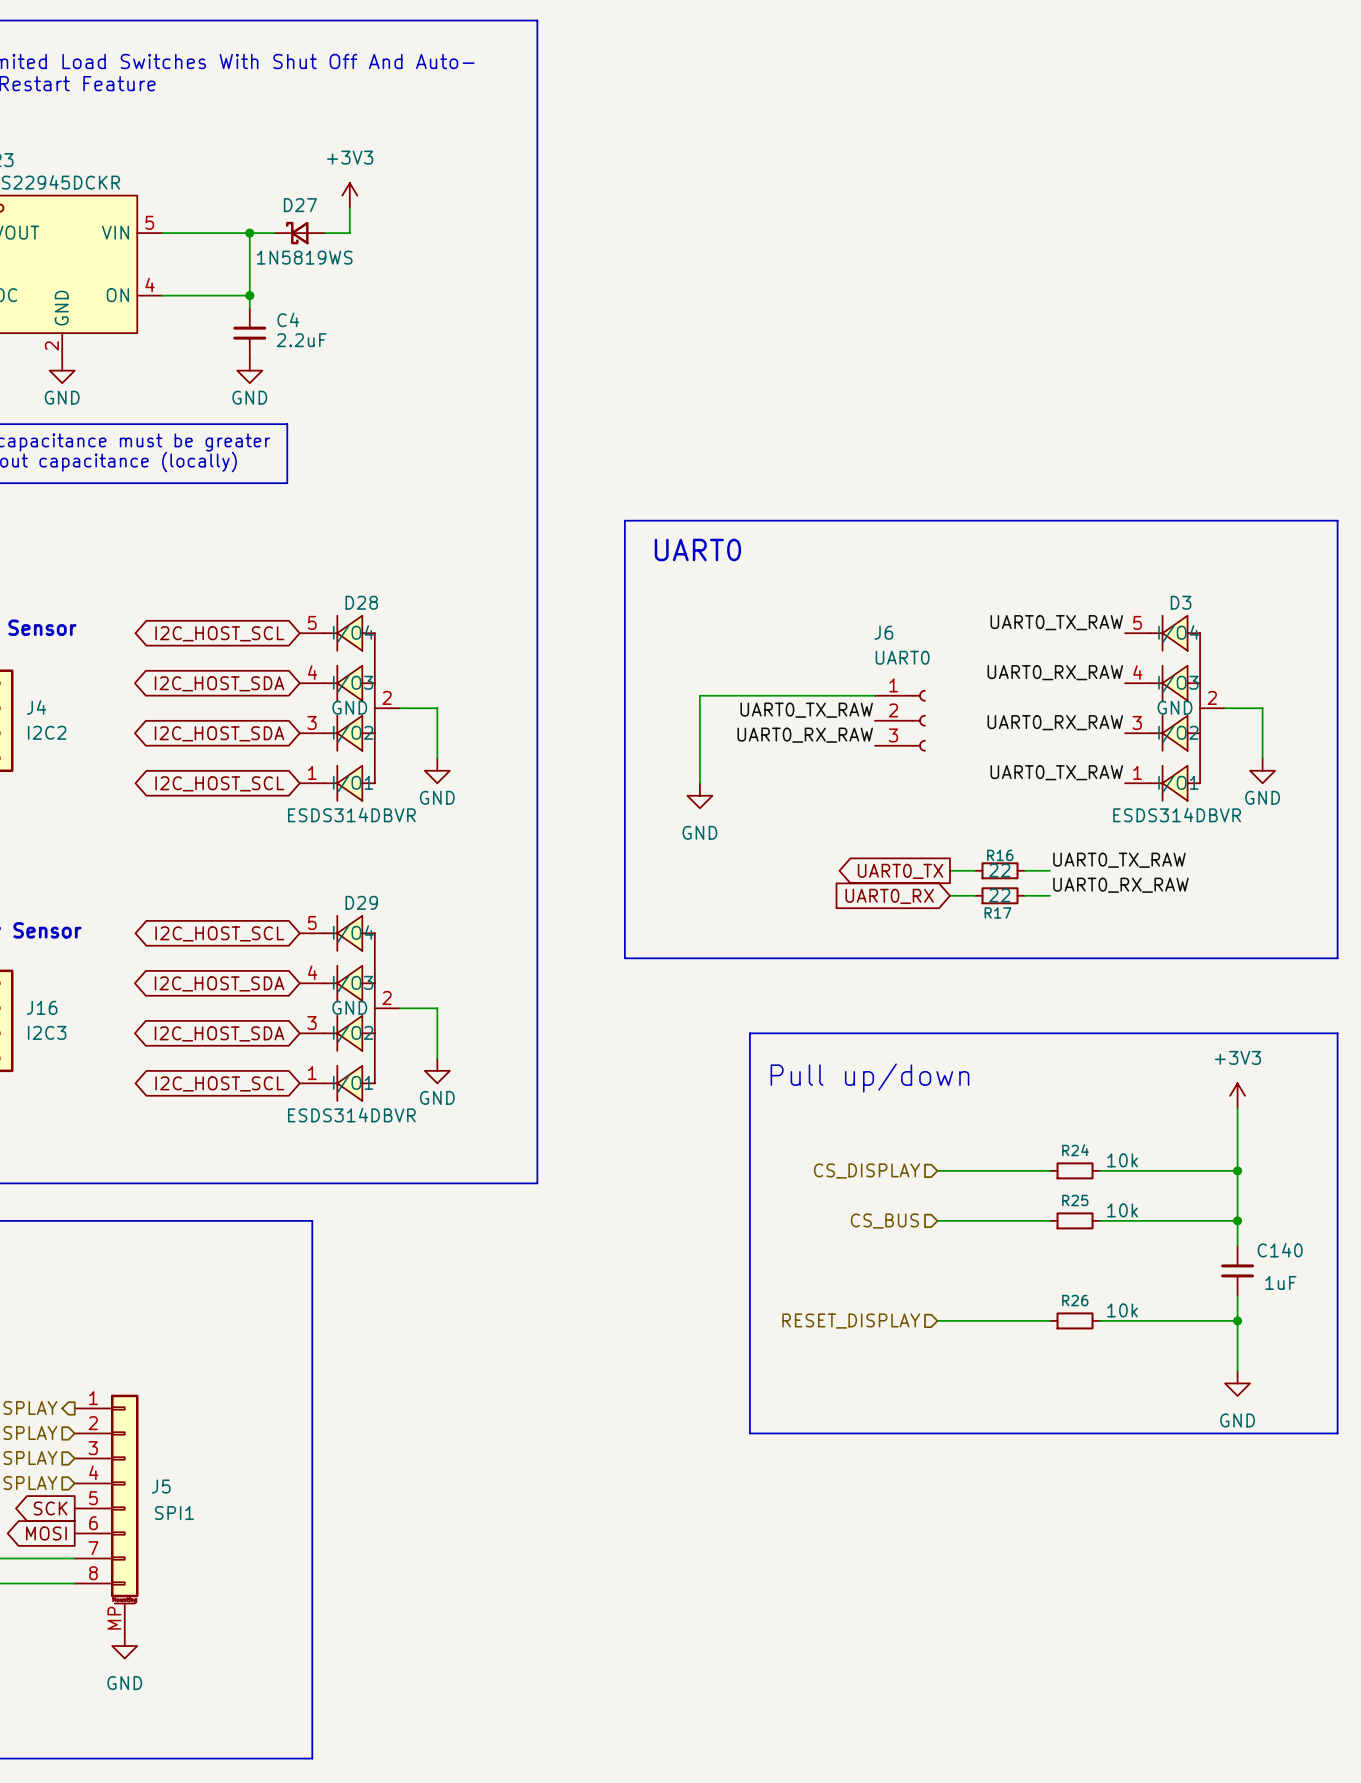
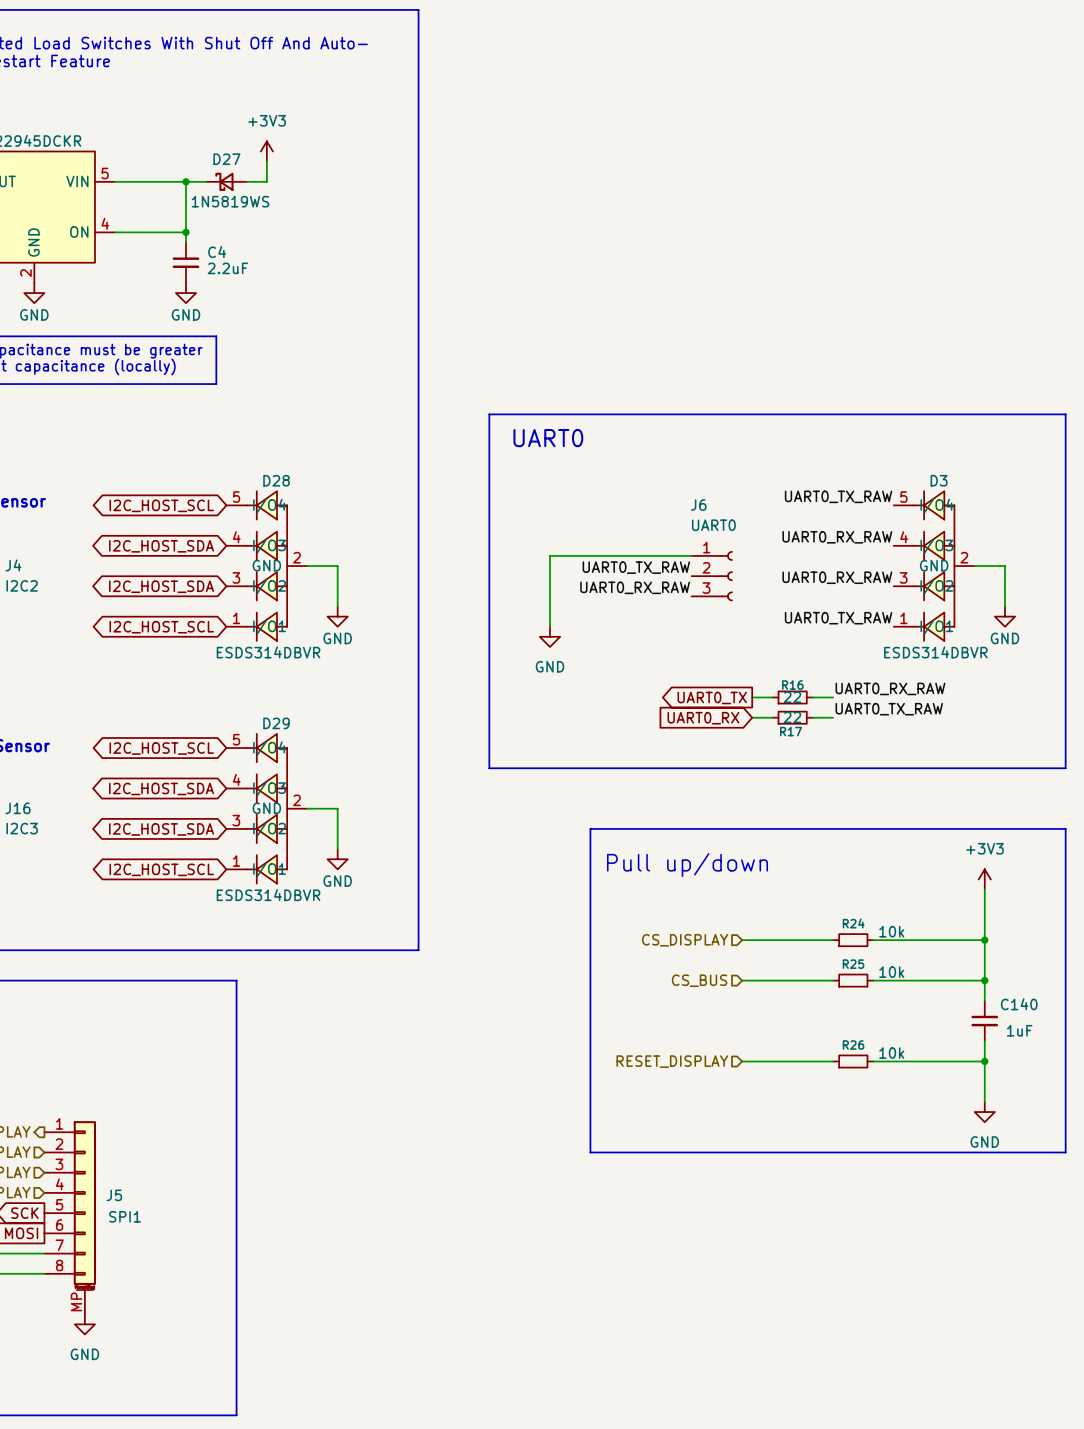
label: UART0_TX_RAW (1119, 860) -> UART0_RX_RAW (890, 688)
label: UART0_RX_RAW (1120, 885) -> UART0_TX_RAW (889, 709)

